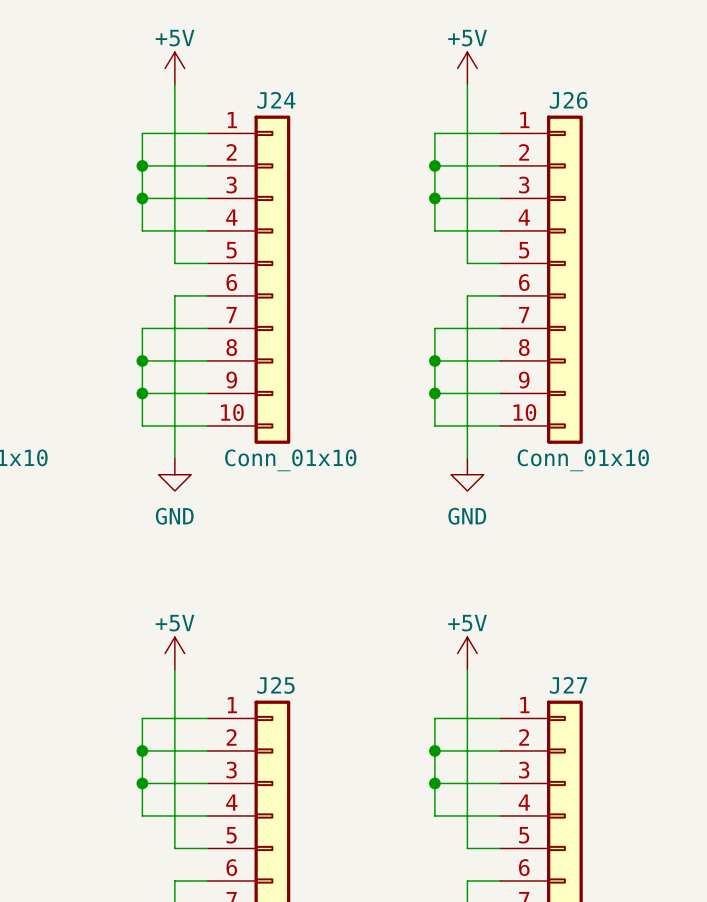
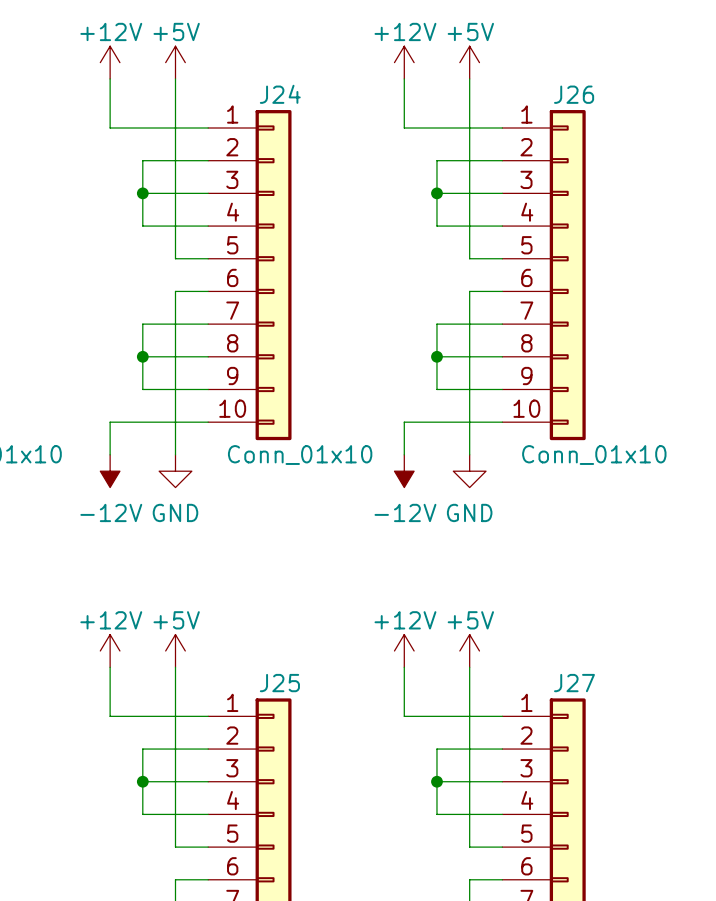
power symbol: none -> +12V (110, 62)
power symbol: none -> +12V (404, 62)
wire: (142, 133) (142, 165) -> (142, 128) (110, 128) (110, 78)
wire: (434, 133) (434, 165) -> (436, 128) (404, 128) (404, 78)
junction: (142, 165) -> none
junction: (434, 165) -> none
wire: (142, 393) (142, 425) -> (110, 454) (110, 422) (142, 422)
junction: (142, 393) -> none
wire: (434, 393) (434, 425) -> (404, 454) (404, 422) (436, 422)
junction: (434, 393) -> none
power symbol: none -> -12V (110, 471)
power symbol: none -> -12V (404, 471)
power symbol: none -> +12V (110, 650)
power symbol: none -> +12V (404, 650)
wire: (142, 718) (142, 750) -> (142, 716) (110, 716) (110, 667)
wire: (434, 718) (434, 750) -> (436, 716) (404, 716) (404, 667)
junction: (142, 750) -> none
junction: (434, 750) -> none

